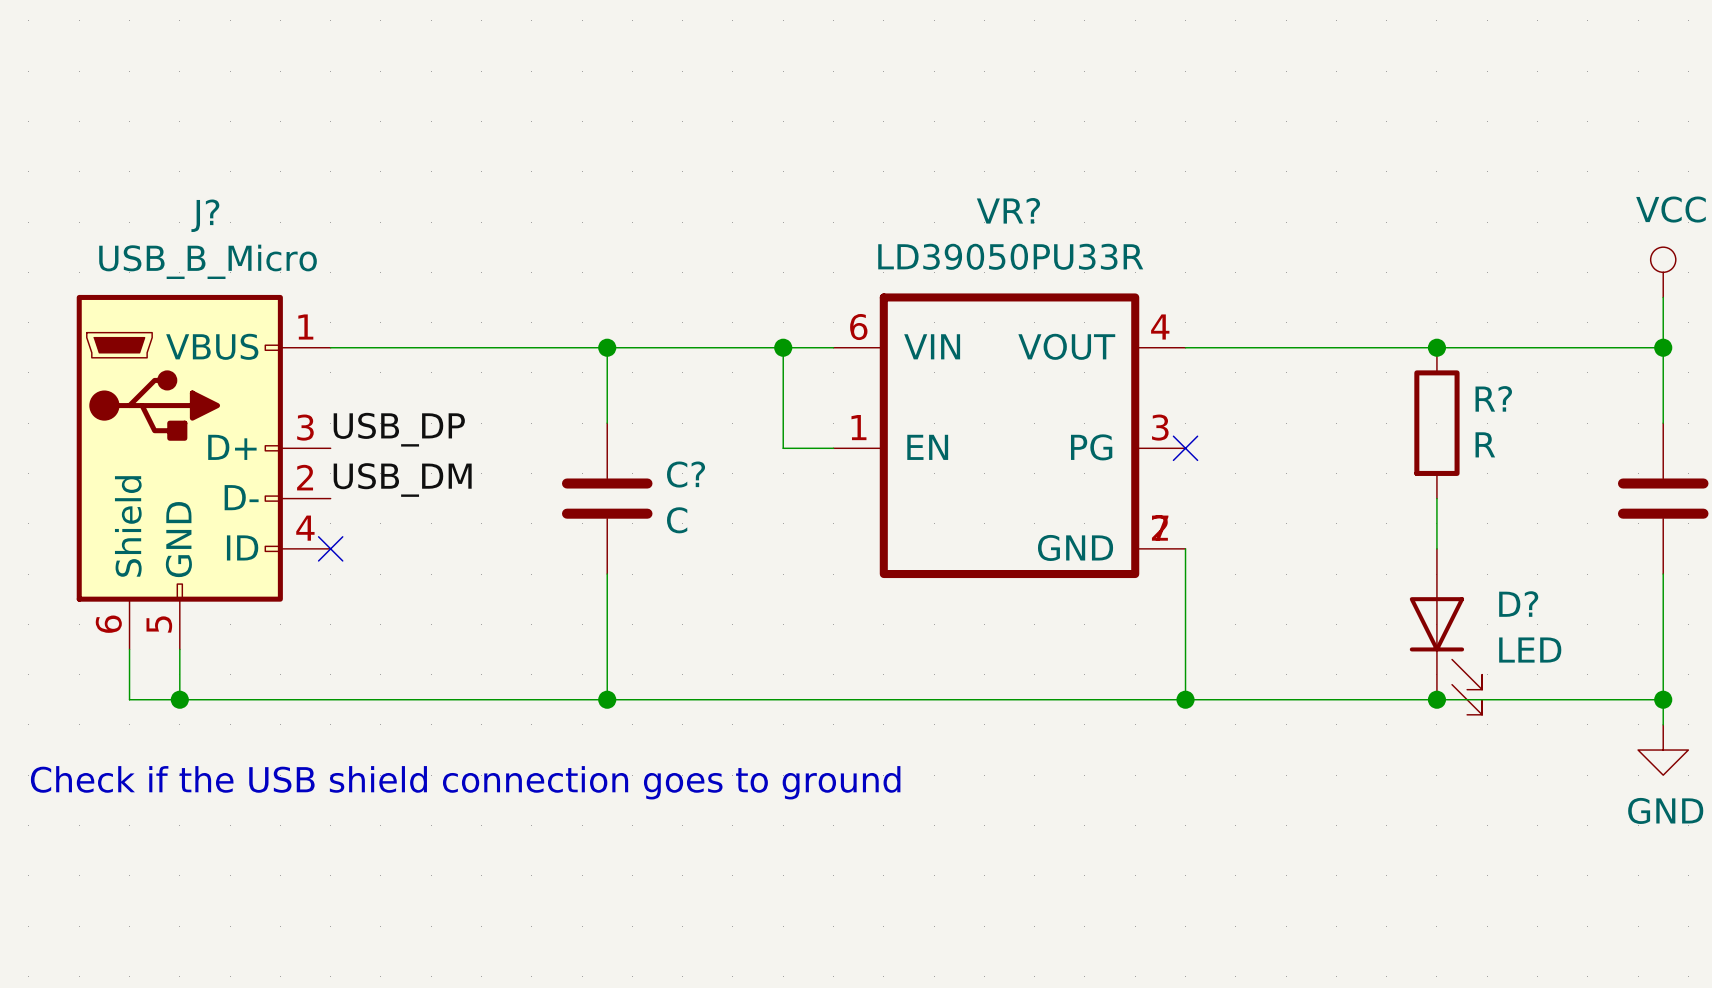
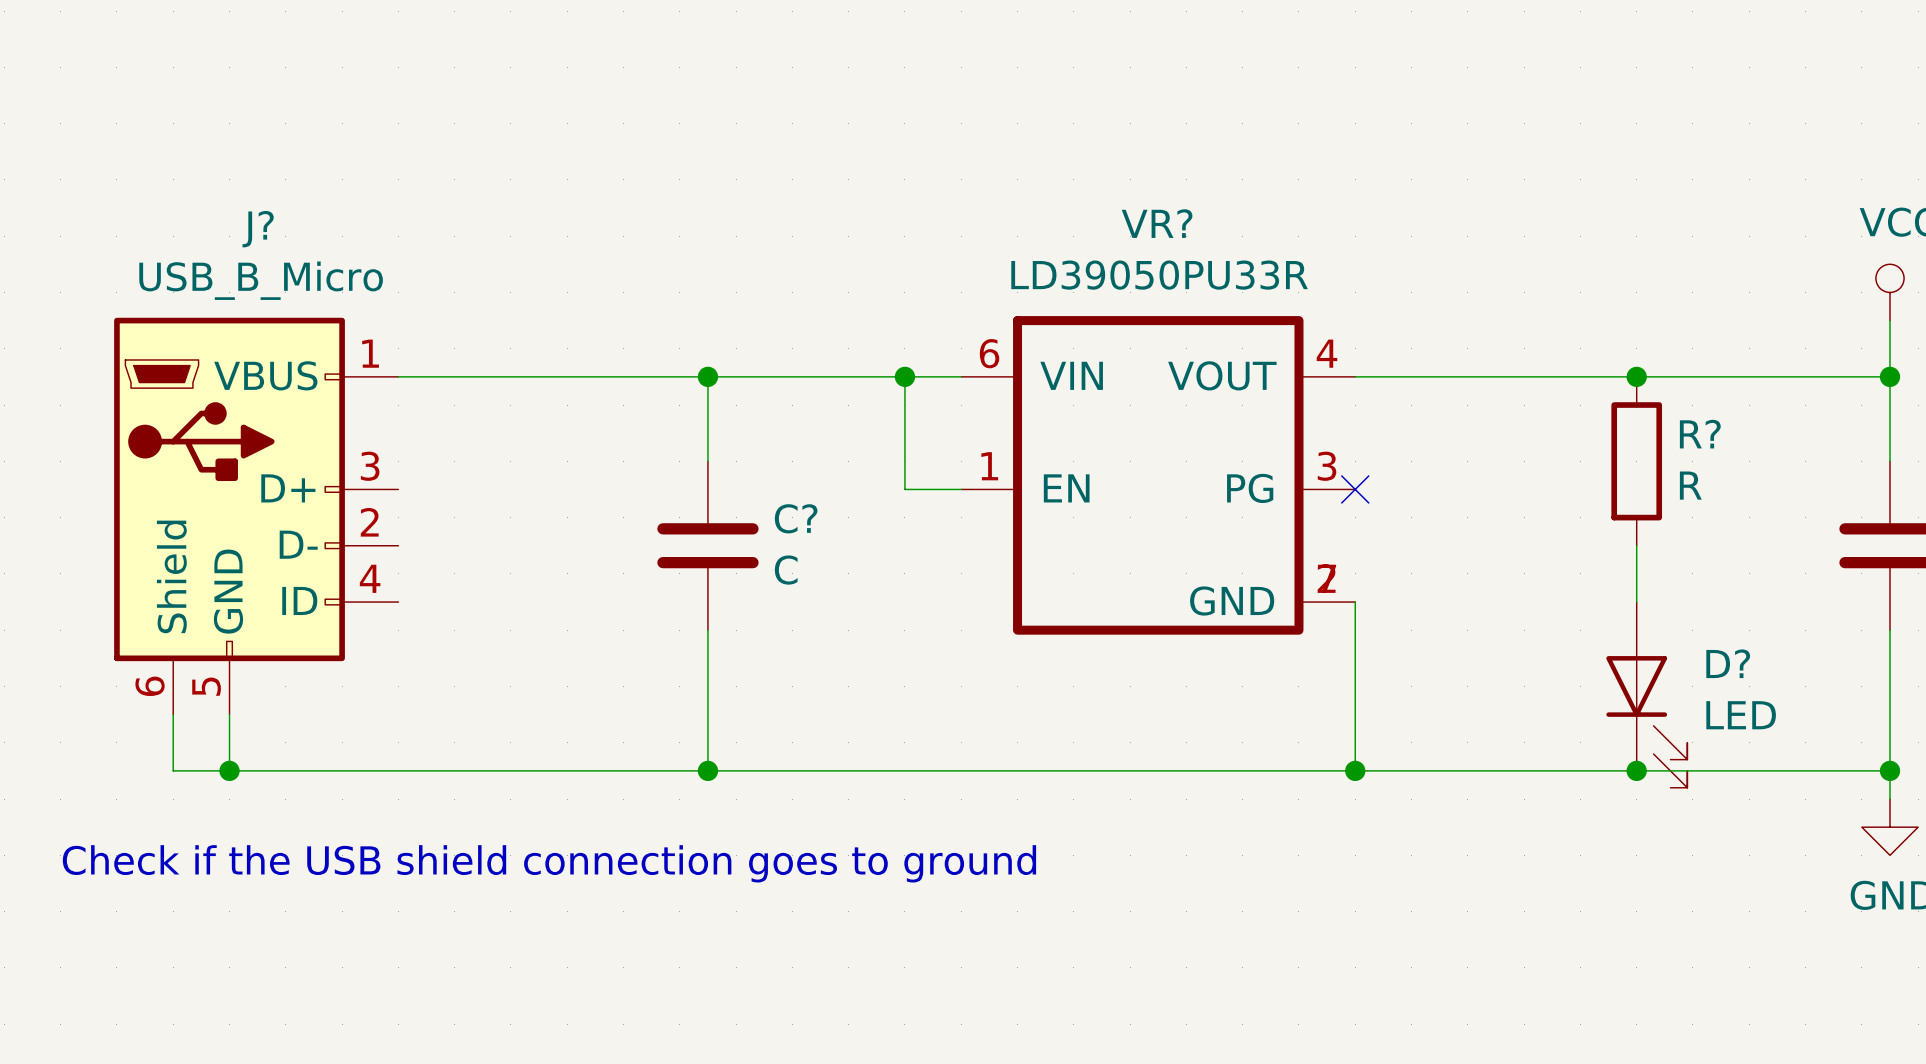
label: USB_DP (399, 429) -> none
label: USB_DM (402, 479) -> none
no-connect mark: (330, 548) -> none

